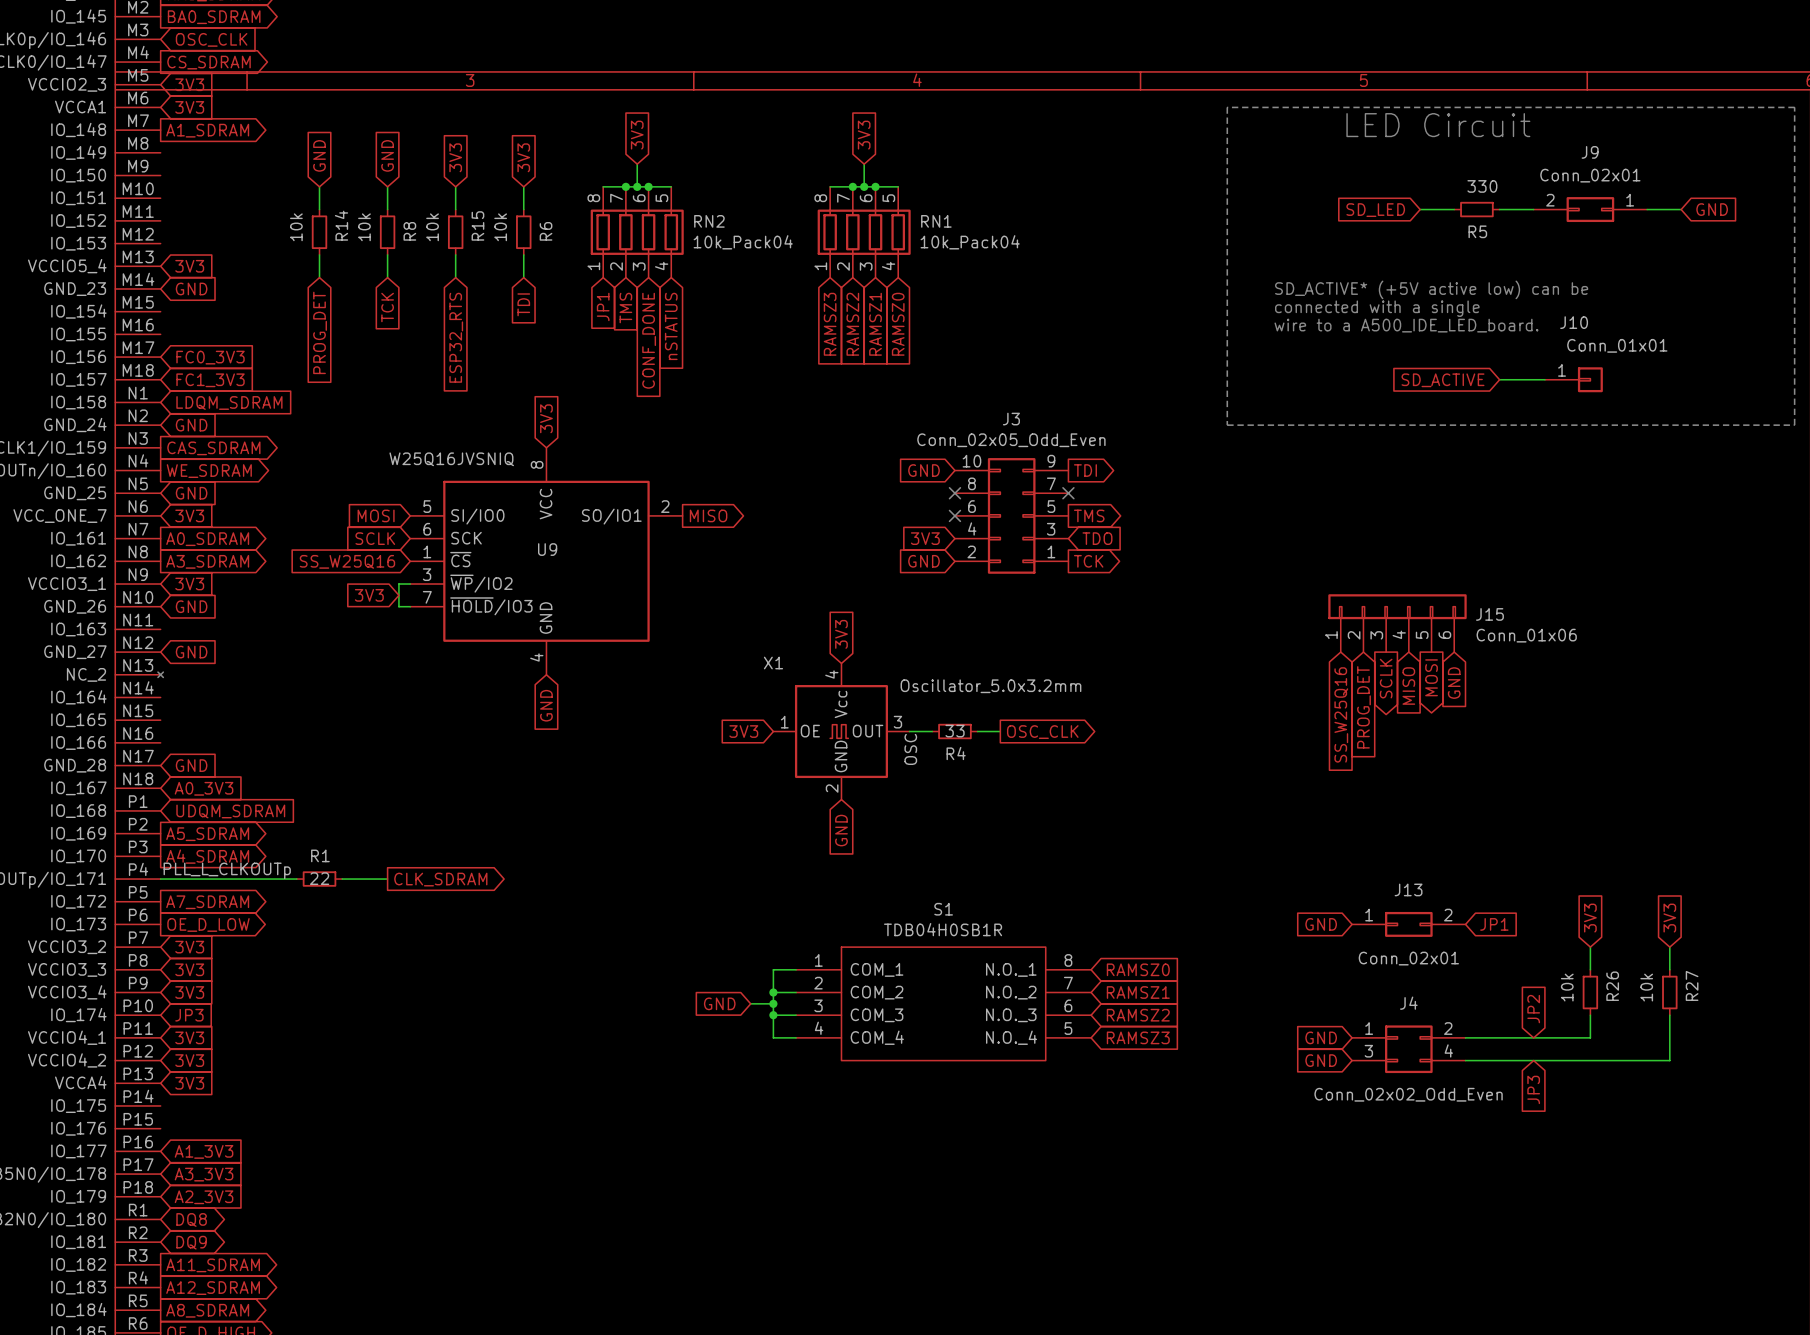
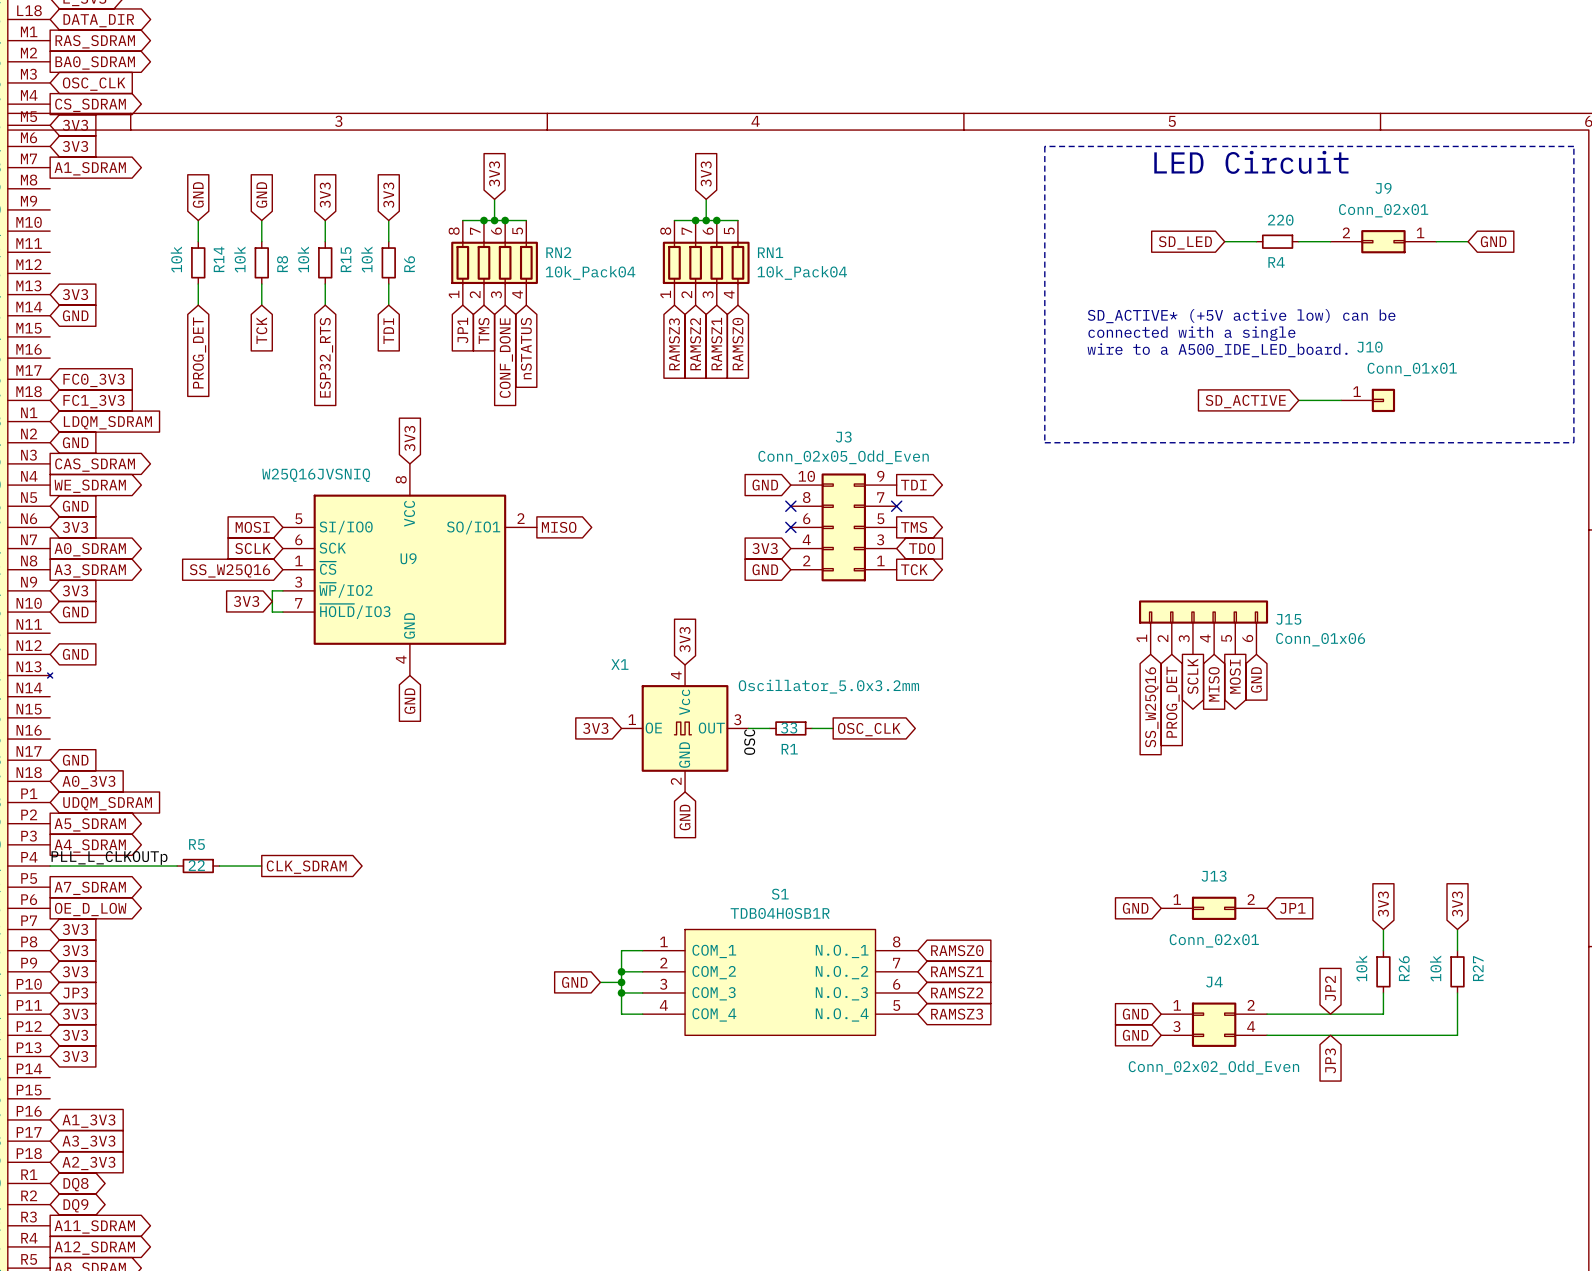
R5 value: 330 (1482, 186) -> 220 (1280, 220)
R5 name: R5 (1477, 231) -> R4 (1276, 262)
R4 name: R4 (956, 753) -> R1 (789, 749)
R1 name: R1 (320, 855) -> R5 (196, 844)

